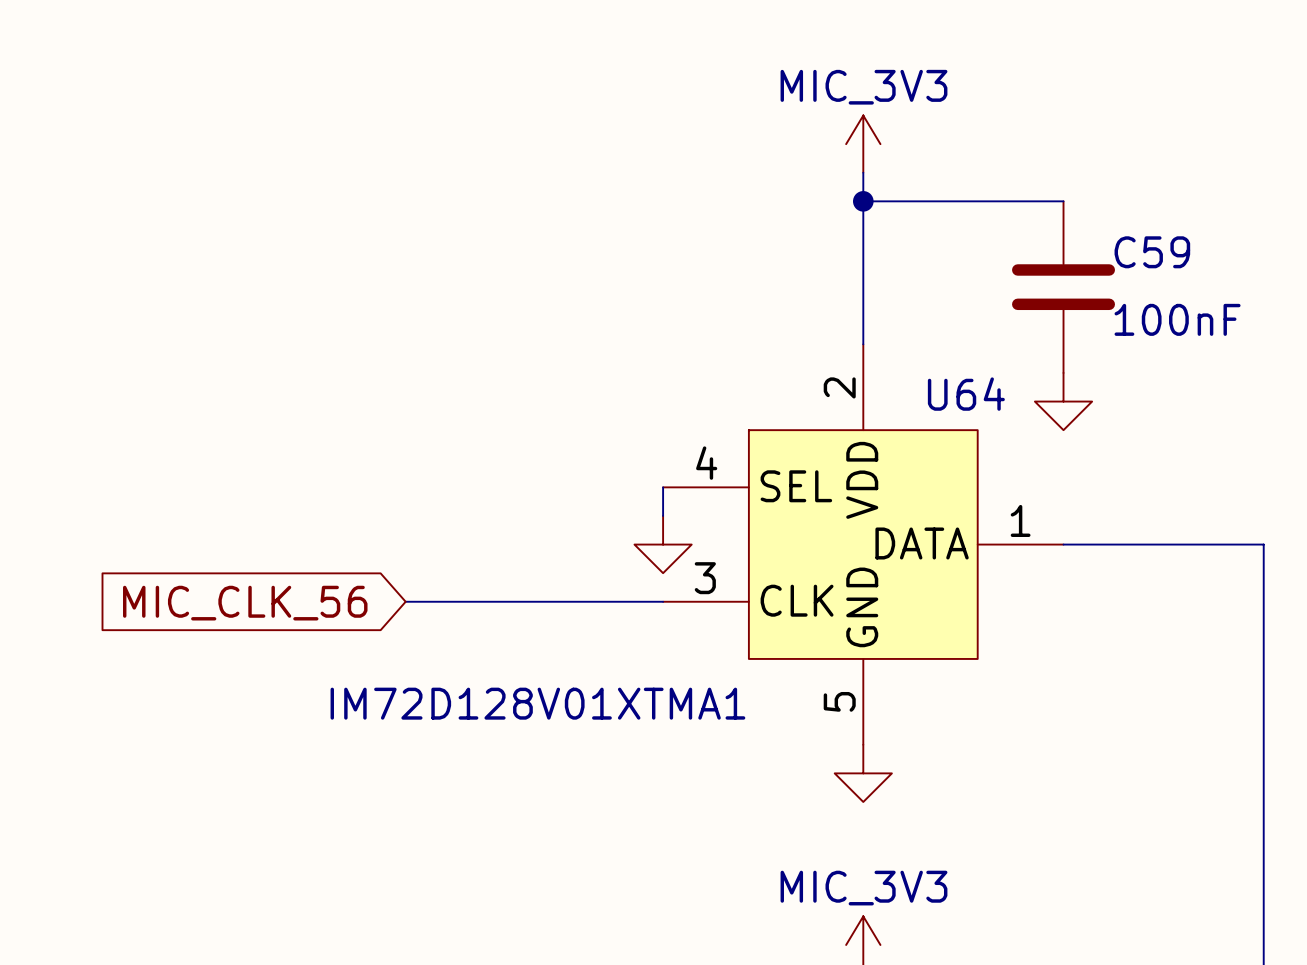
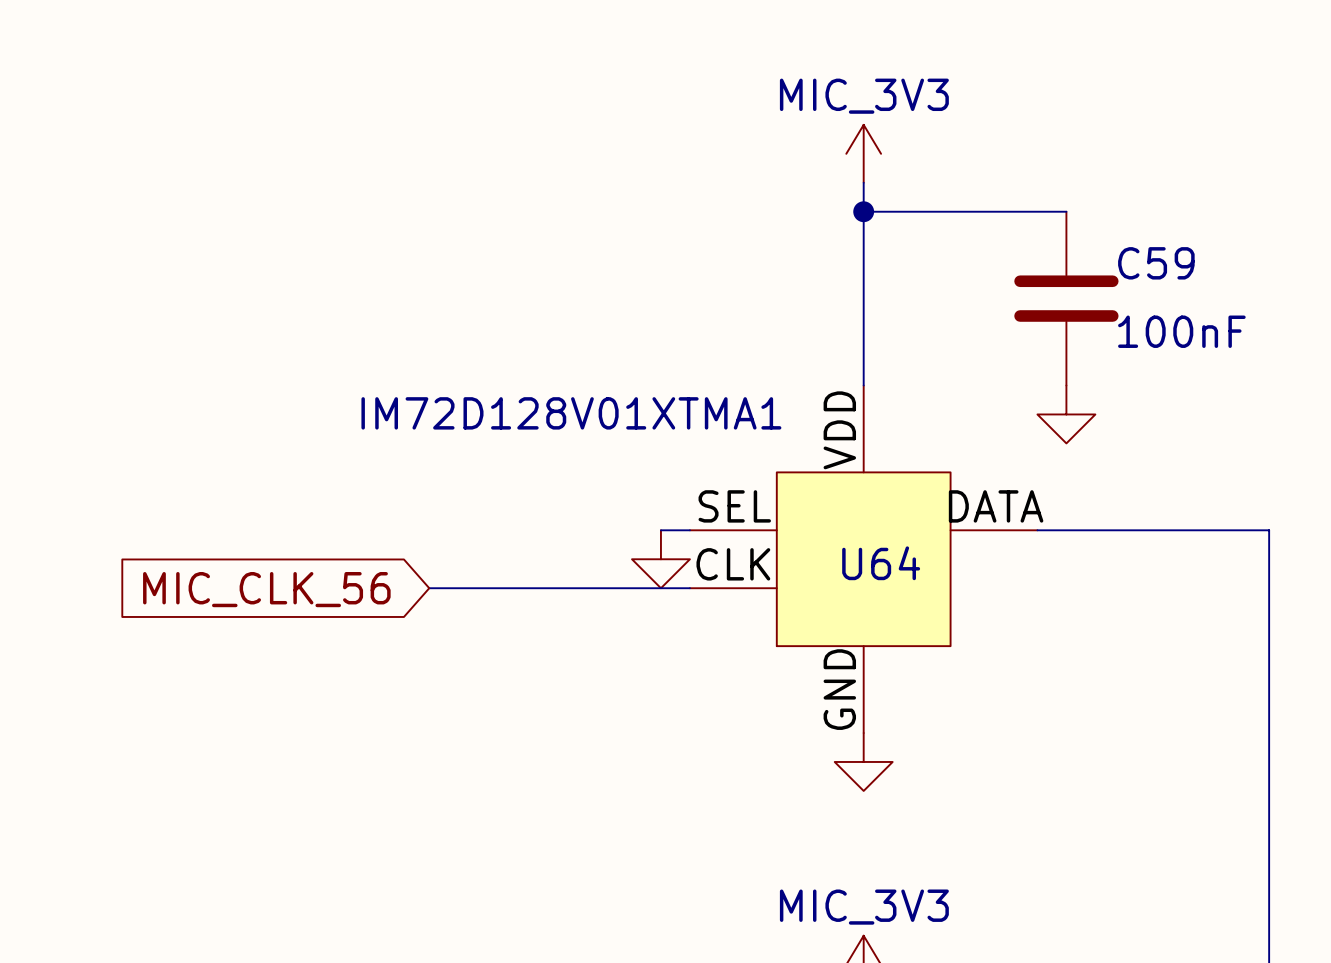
U64 symbol: [663, 344, 1064, 745] -> [689, 385, 1038, 734]
U64 name position: U64 (966, 394) -> U64 (881, 563)
wire: (663, 487) (663, 515) -> (689, 530) (660, 530)
wire: (1063, 544) (1263, 544) -> (1037, 530) (1269, 530) (1269, 559)
wire: (405, 601) (663, 601) -> (429, 588) (689, 588)
global label position: MIC_CLK_56 (245, 603) -> MIC_CLK_56 (266, 589)
U64 value position: IM72D128V01XTMA1 (537, 703) -> IM72D128V01XTMA1 (571, 413)
power symbol position: (863, 773) -> (863, 761)

